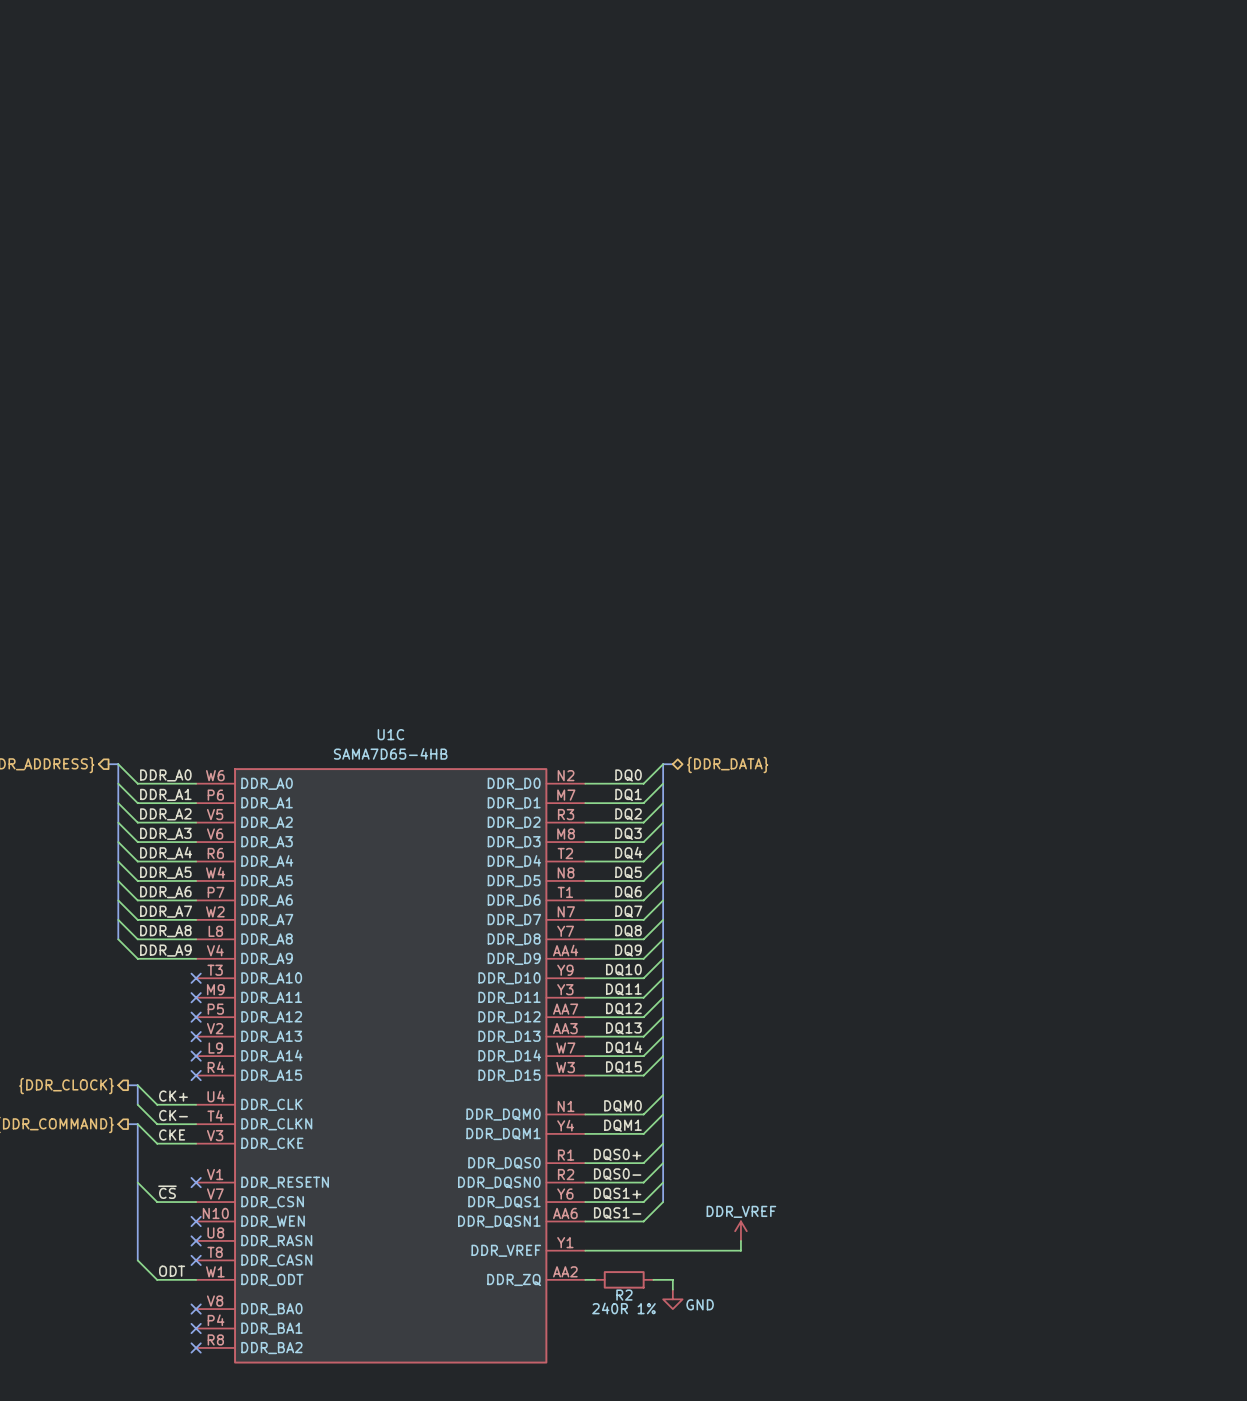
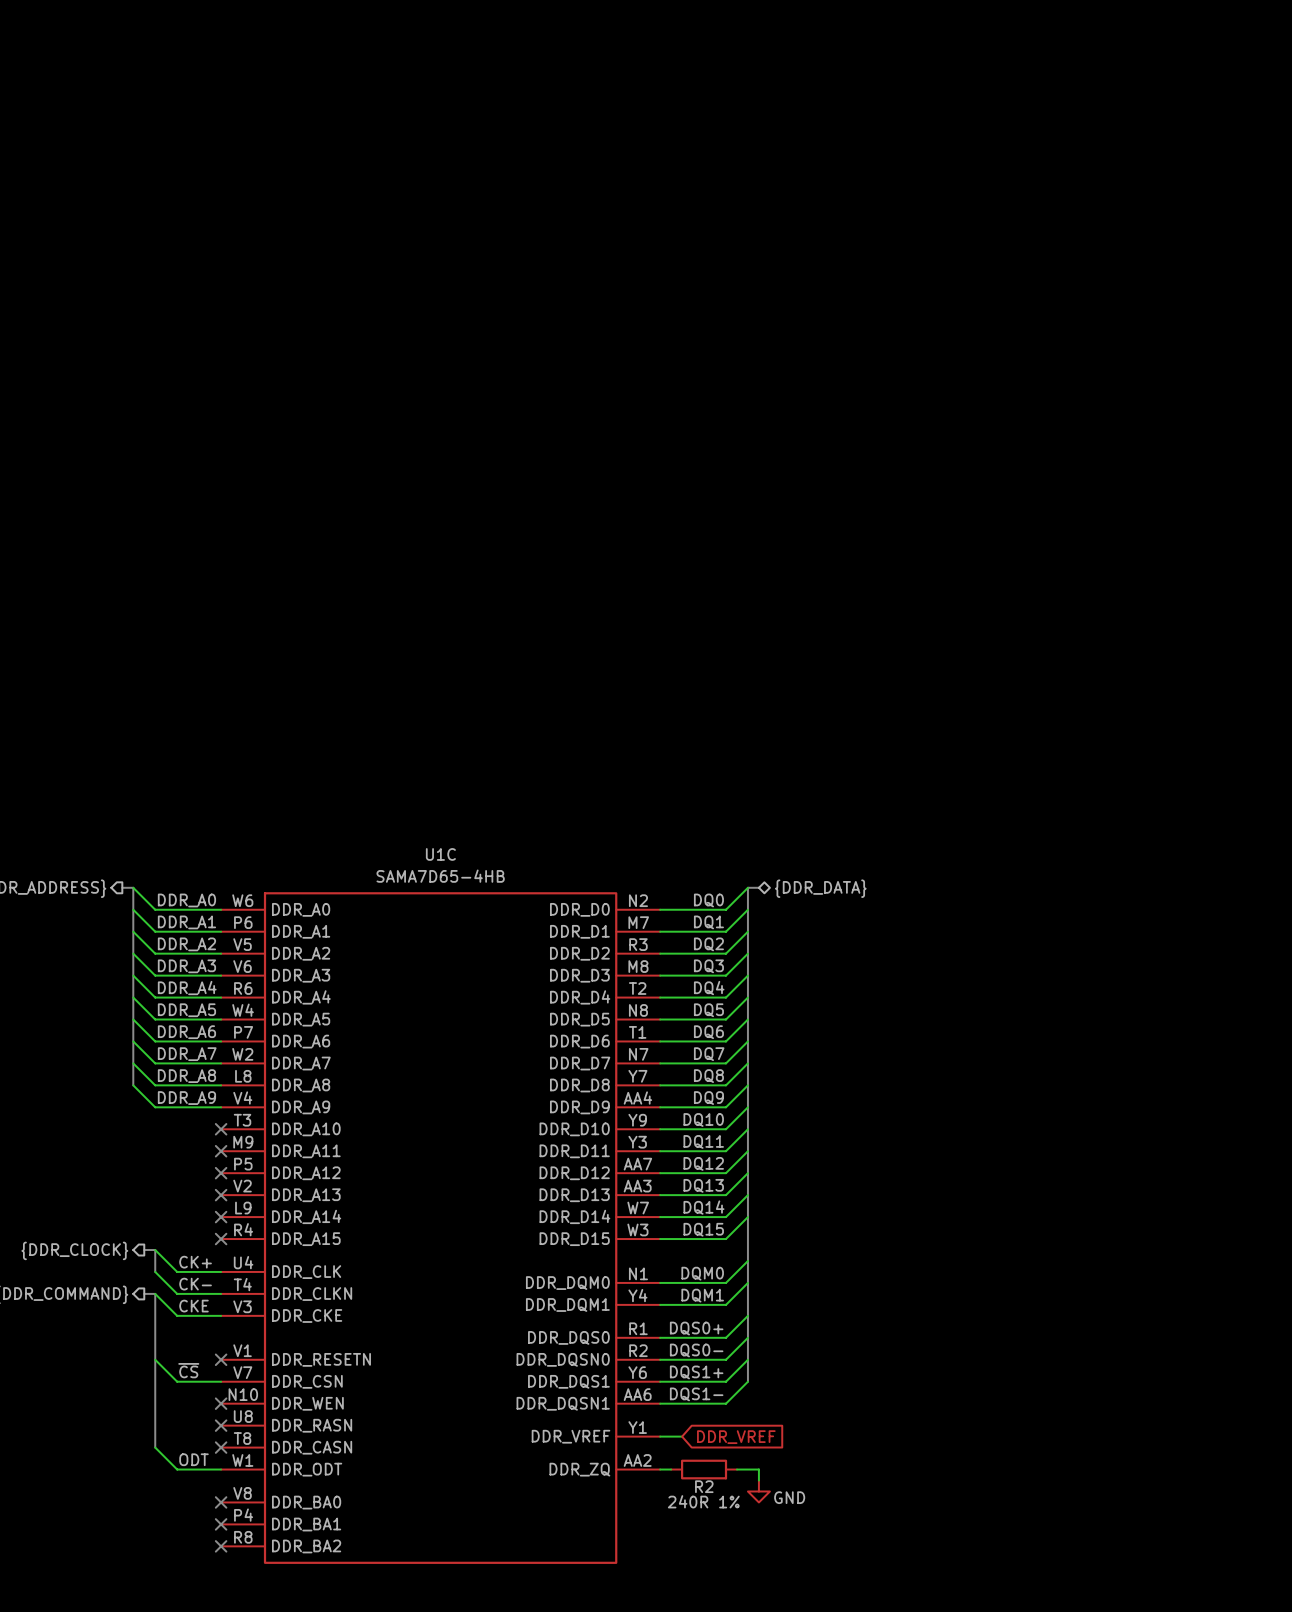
power symbol: DDR_VREF (740, 1231) -> none
wire: (740, 1240) (740, 1250) (604, 1250) -> none
global label: none -> DDR_VREF (736, 1437)

